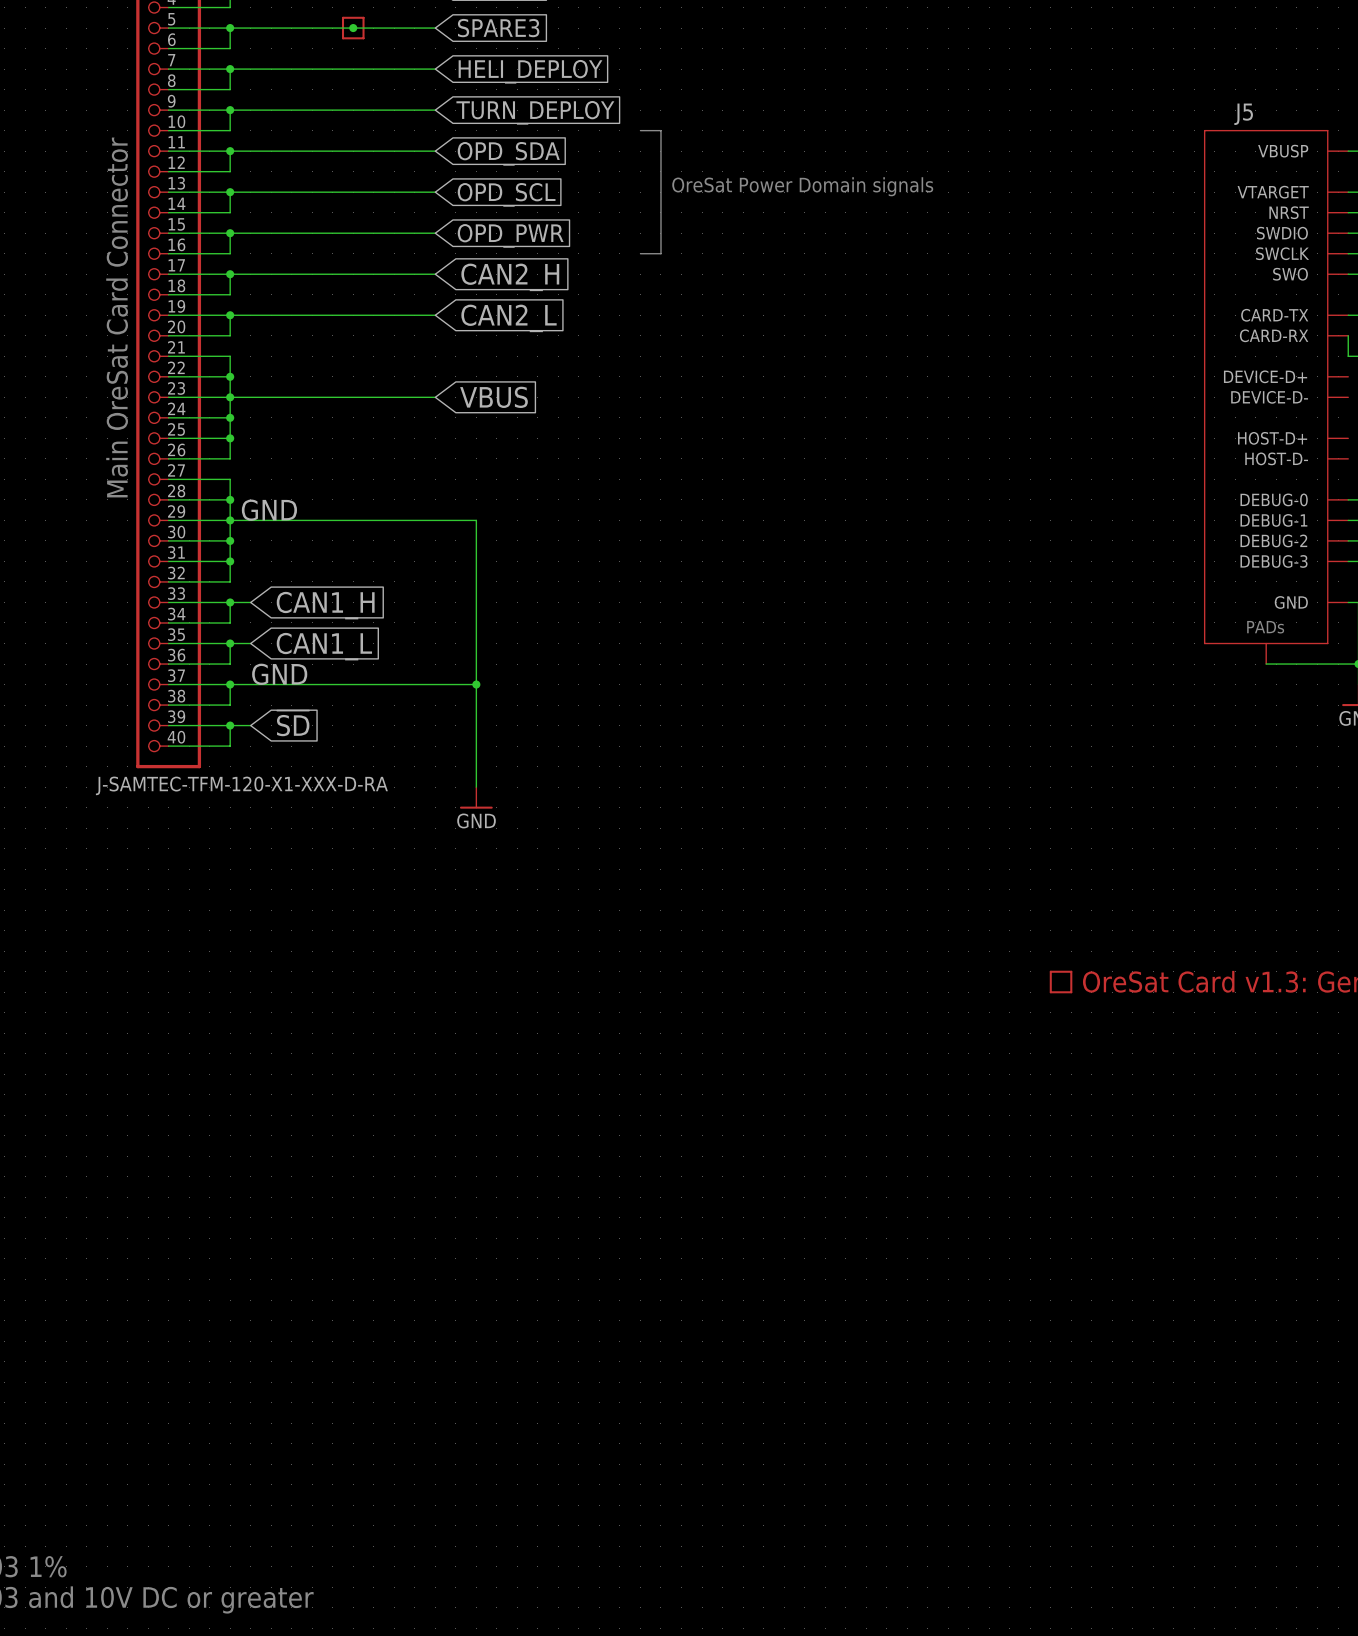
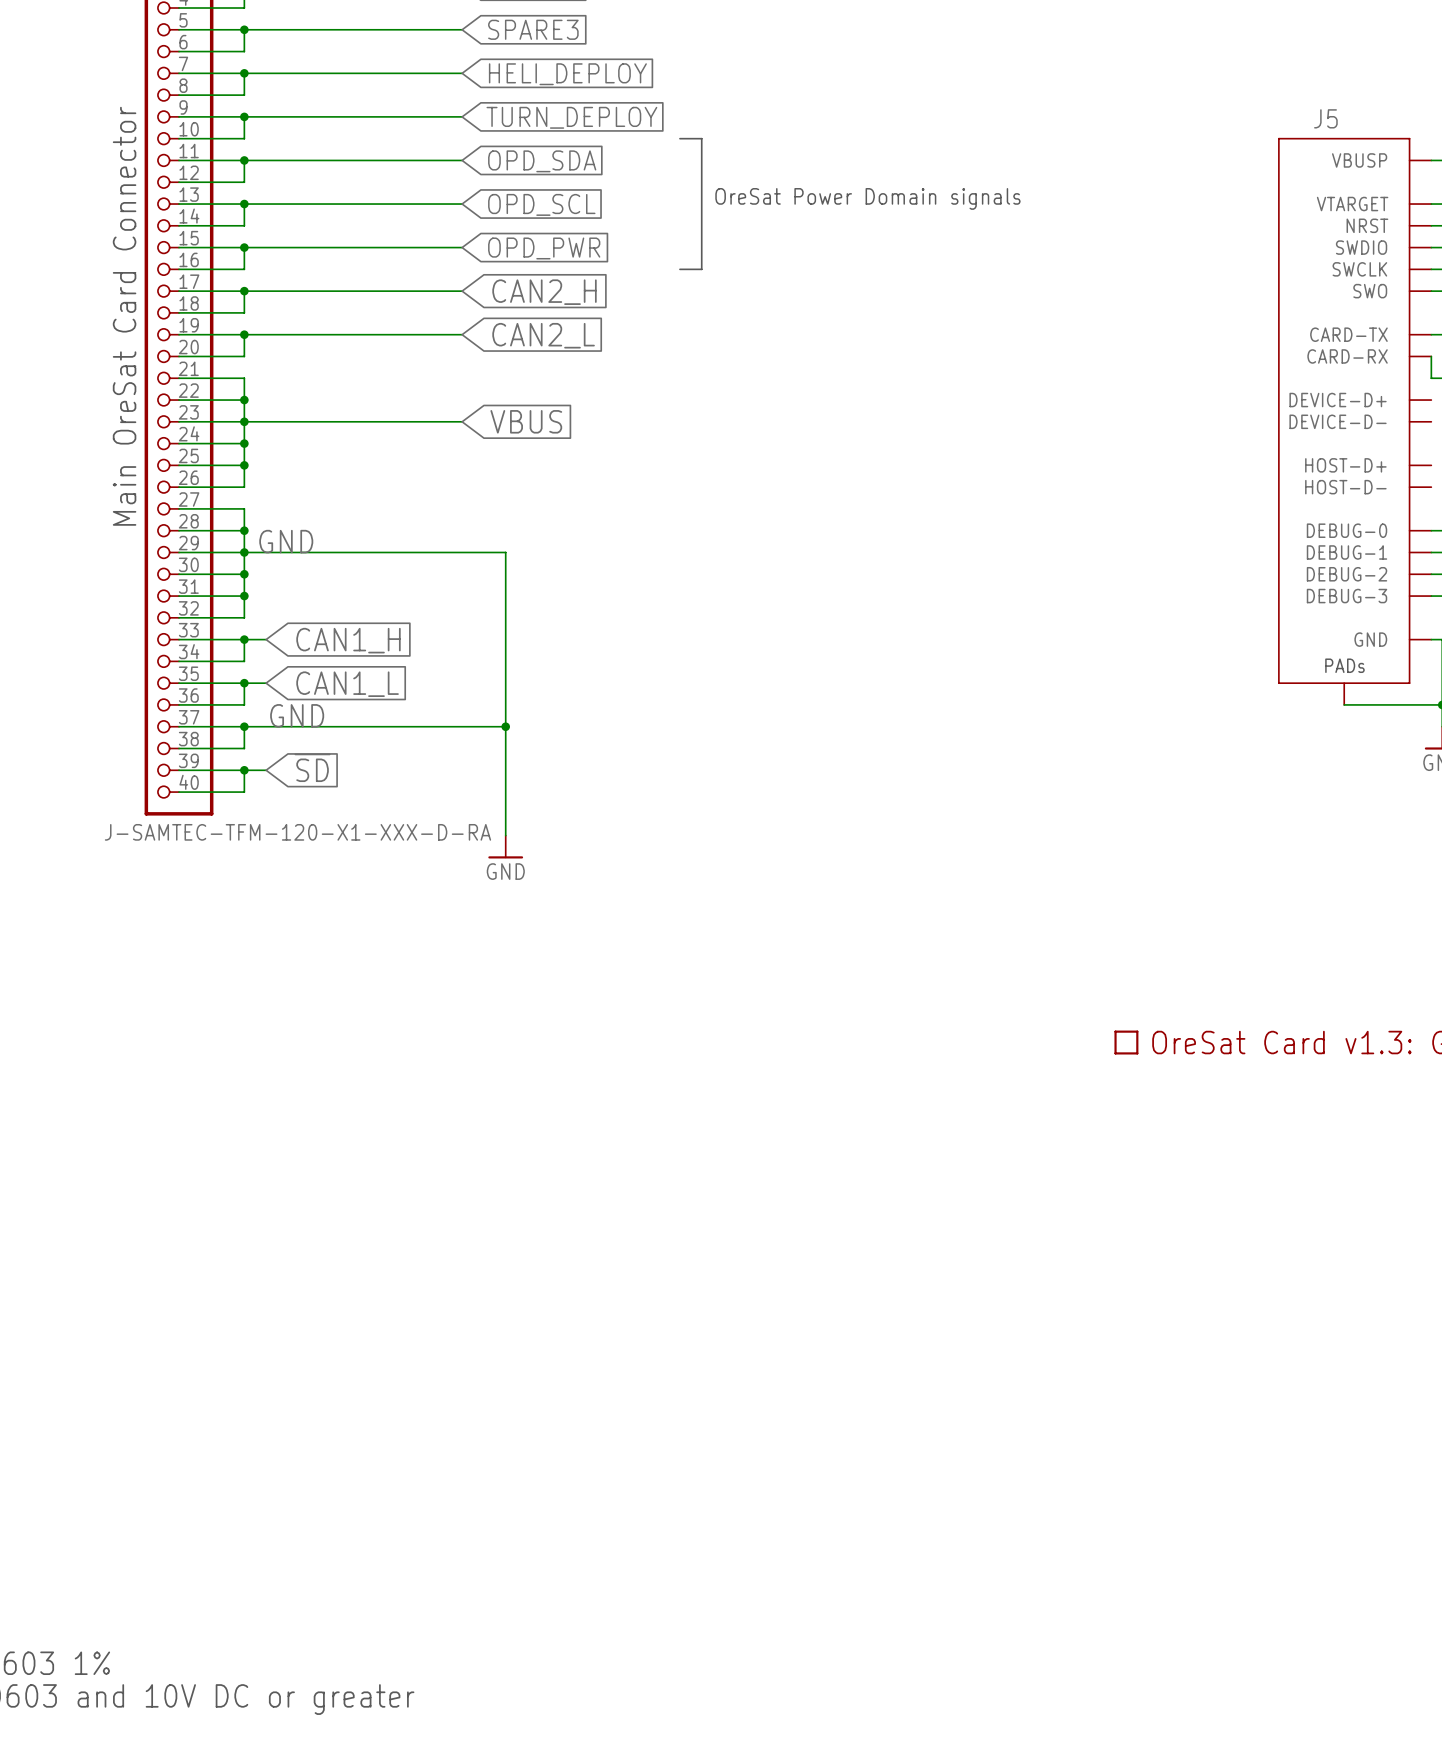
part: (353, 28) -> none
junction: (353, 28) -> none

